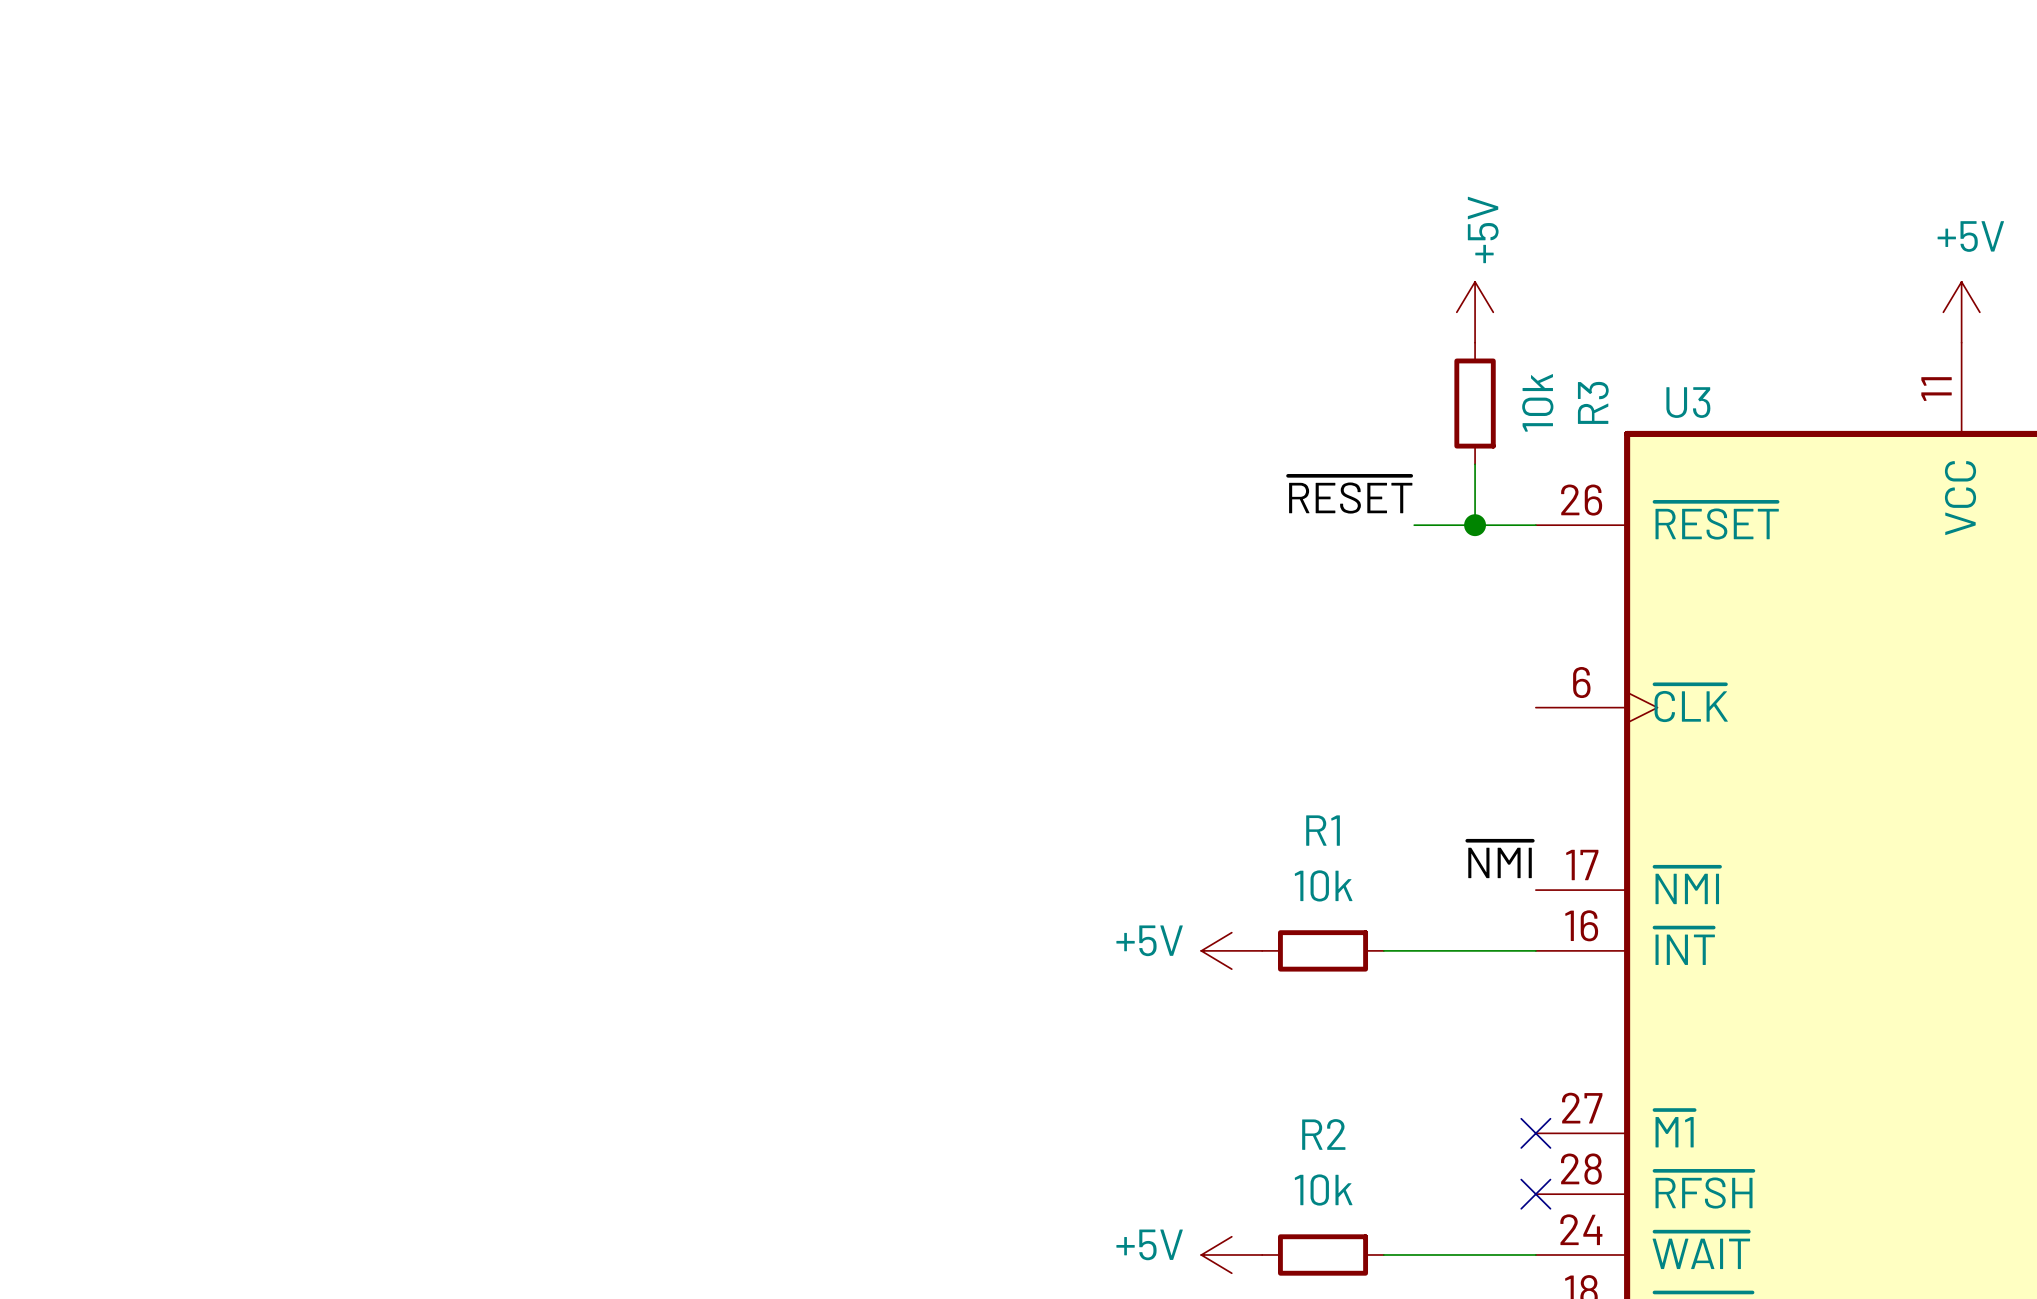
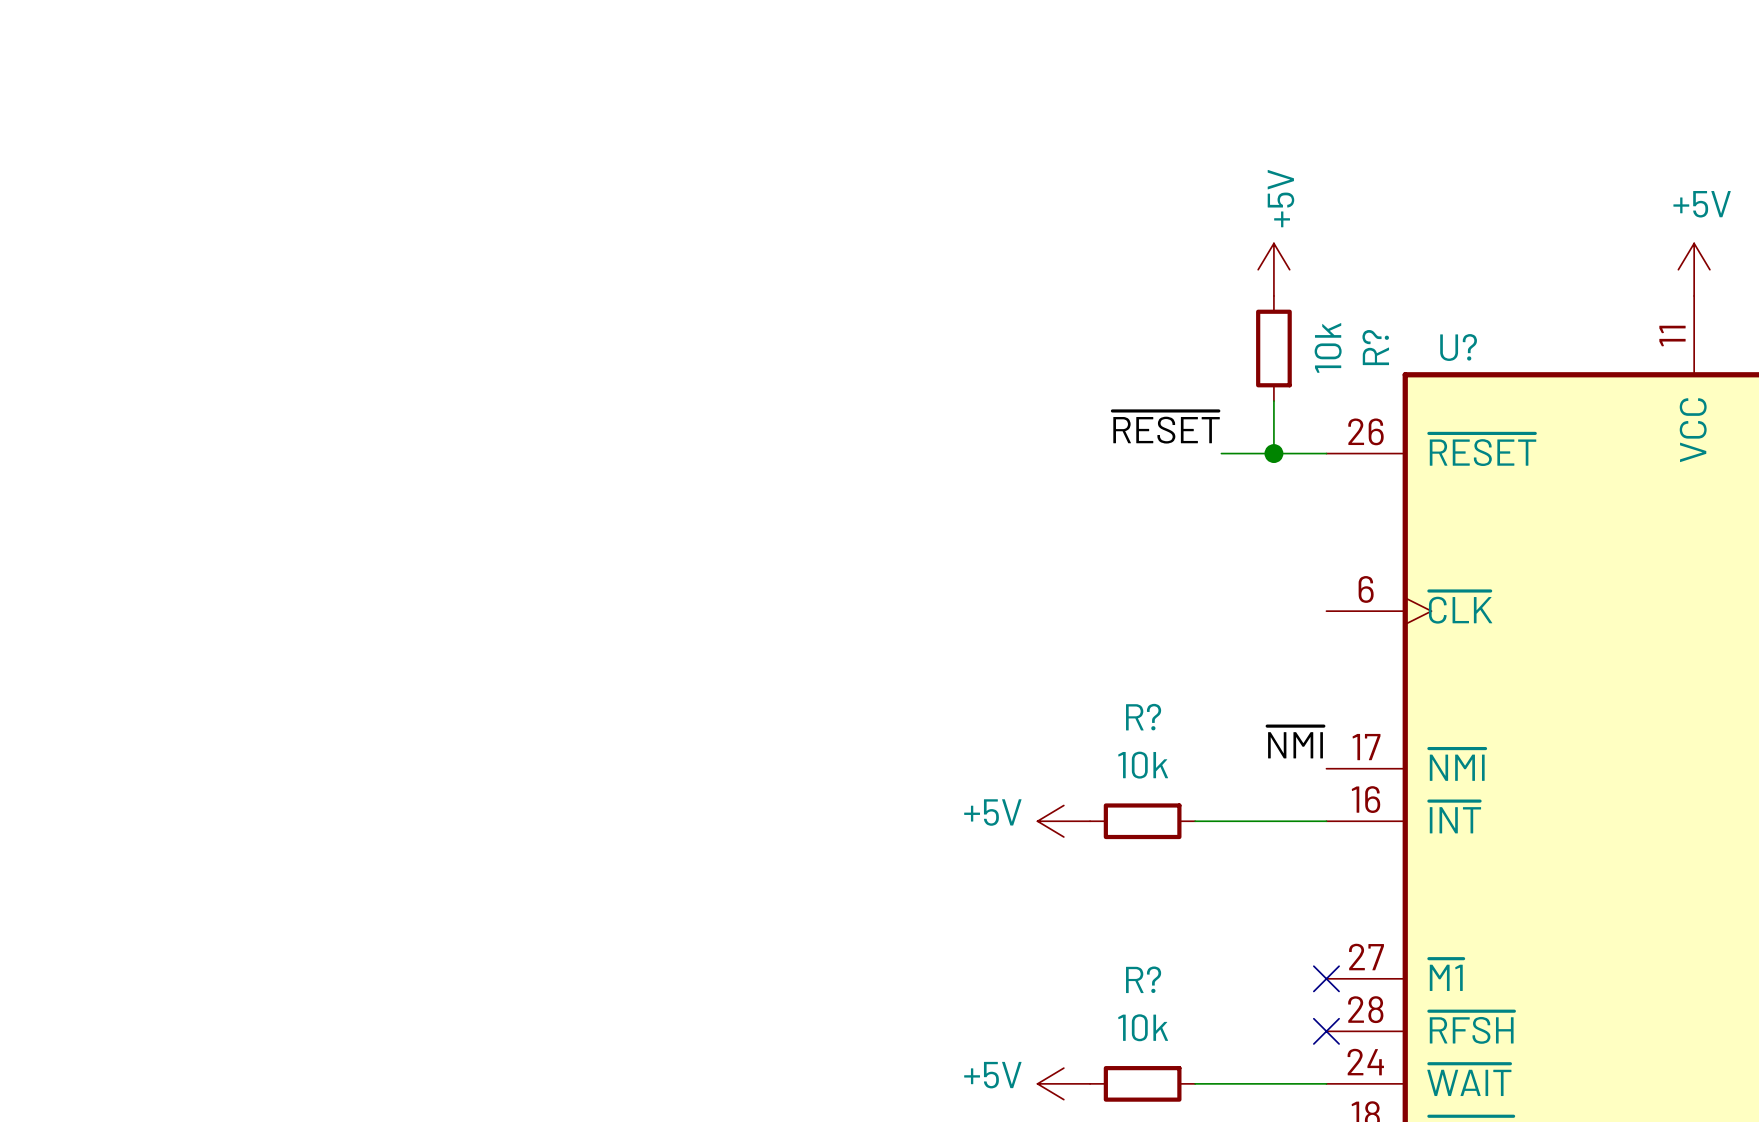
R3 name: R3 (1593, 402) -> R? (1375, 347)
U3 name: U3 (1688, 402) -> U? (1458, 347)
R1 name: R1 (1323, 830) -> R? (1143, 717)
R2 name: R2 (1323, 1134) -> R? (1143, 979)

